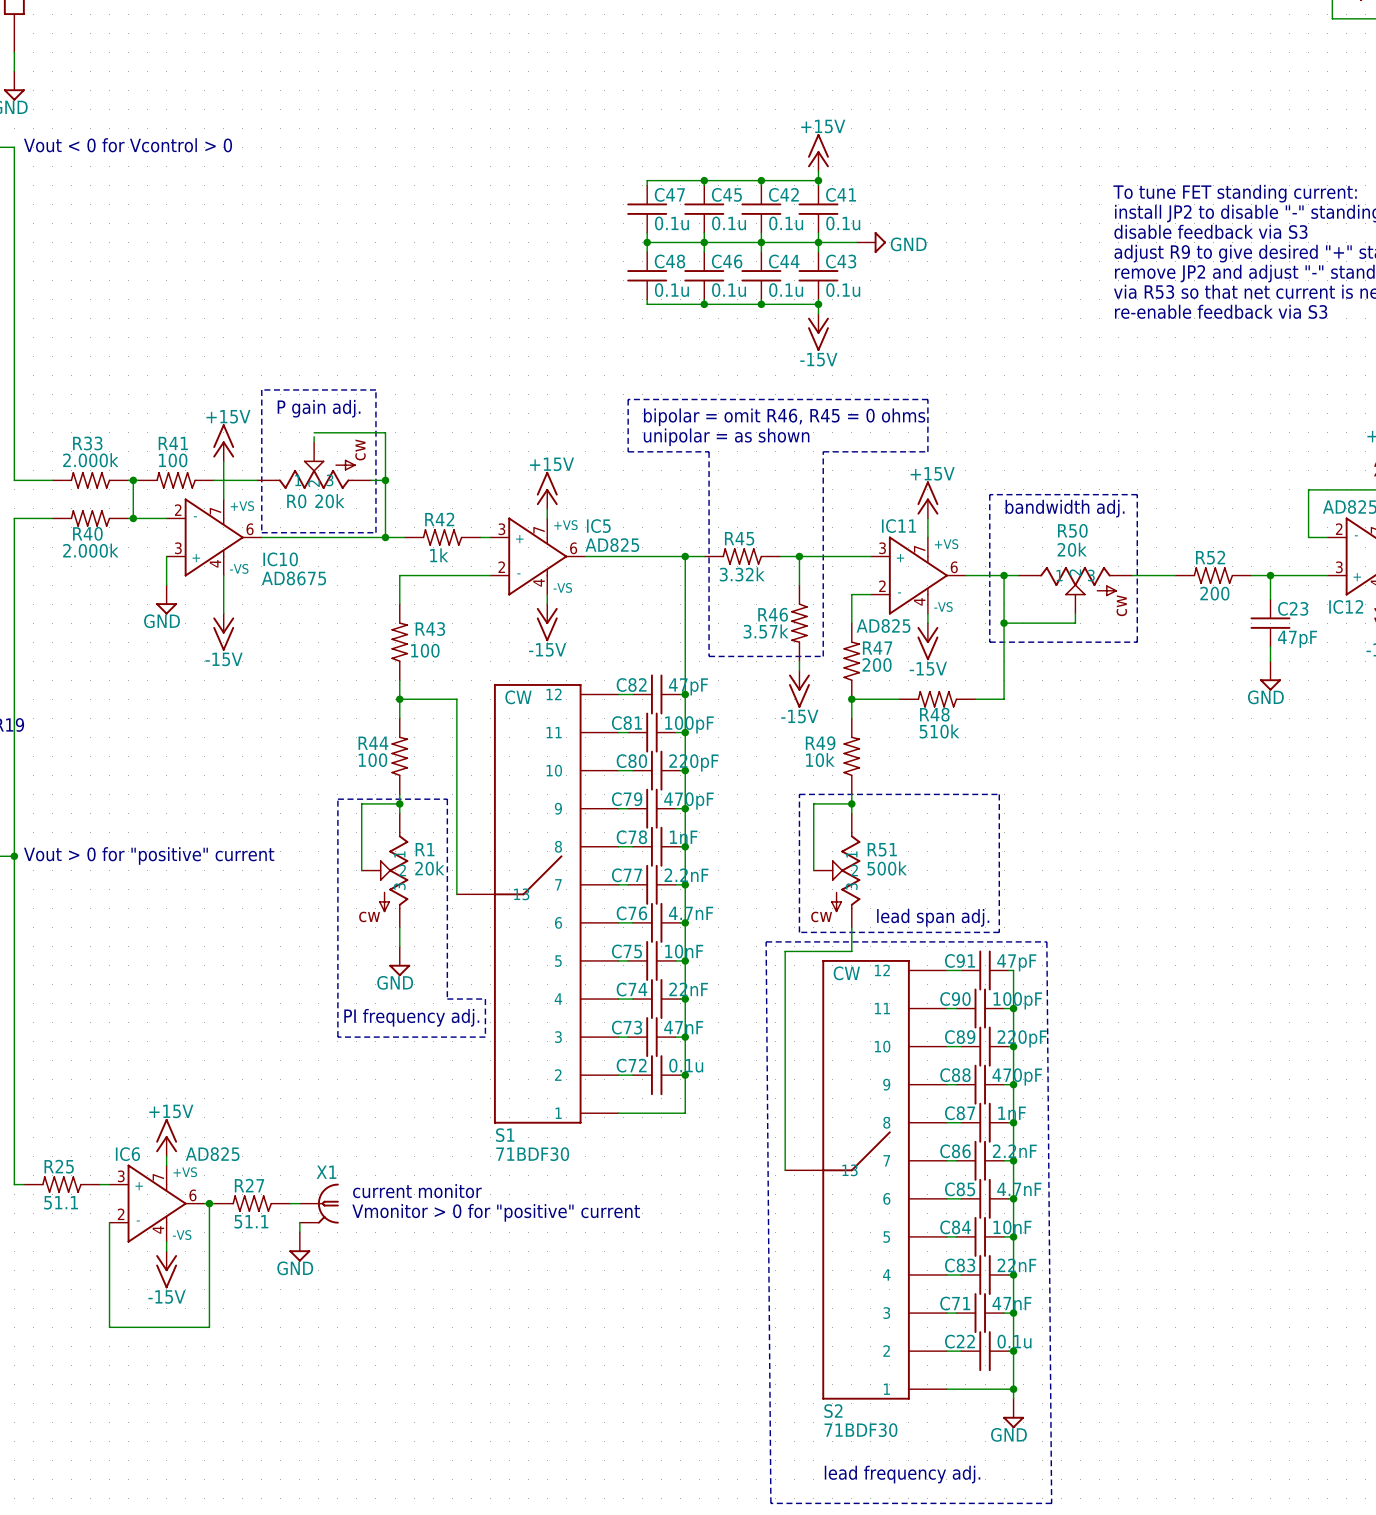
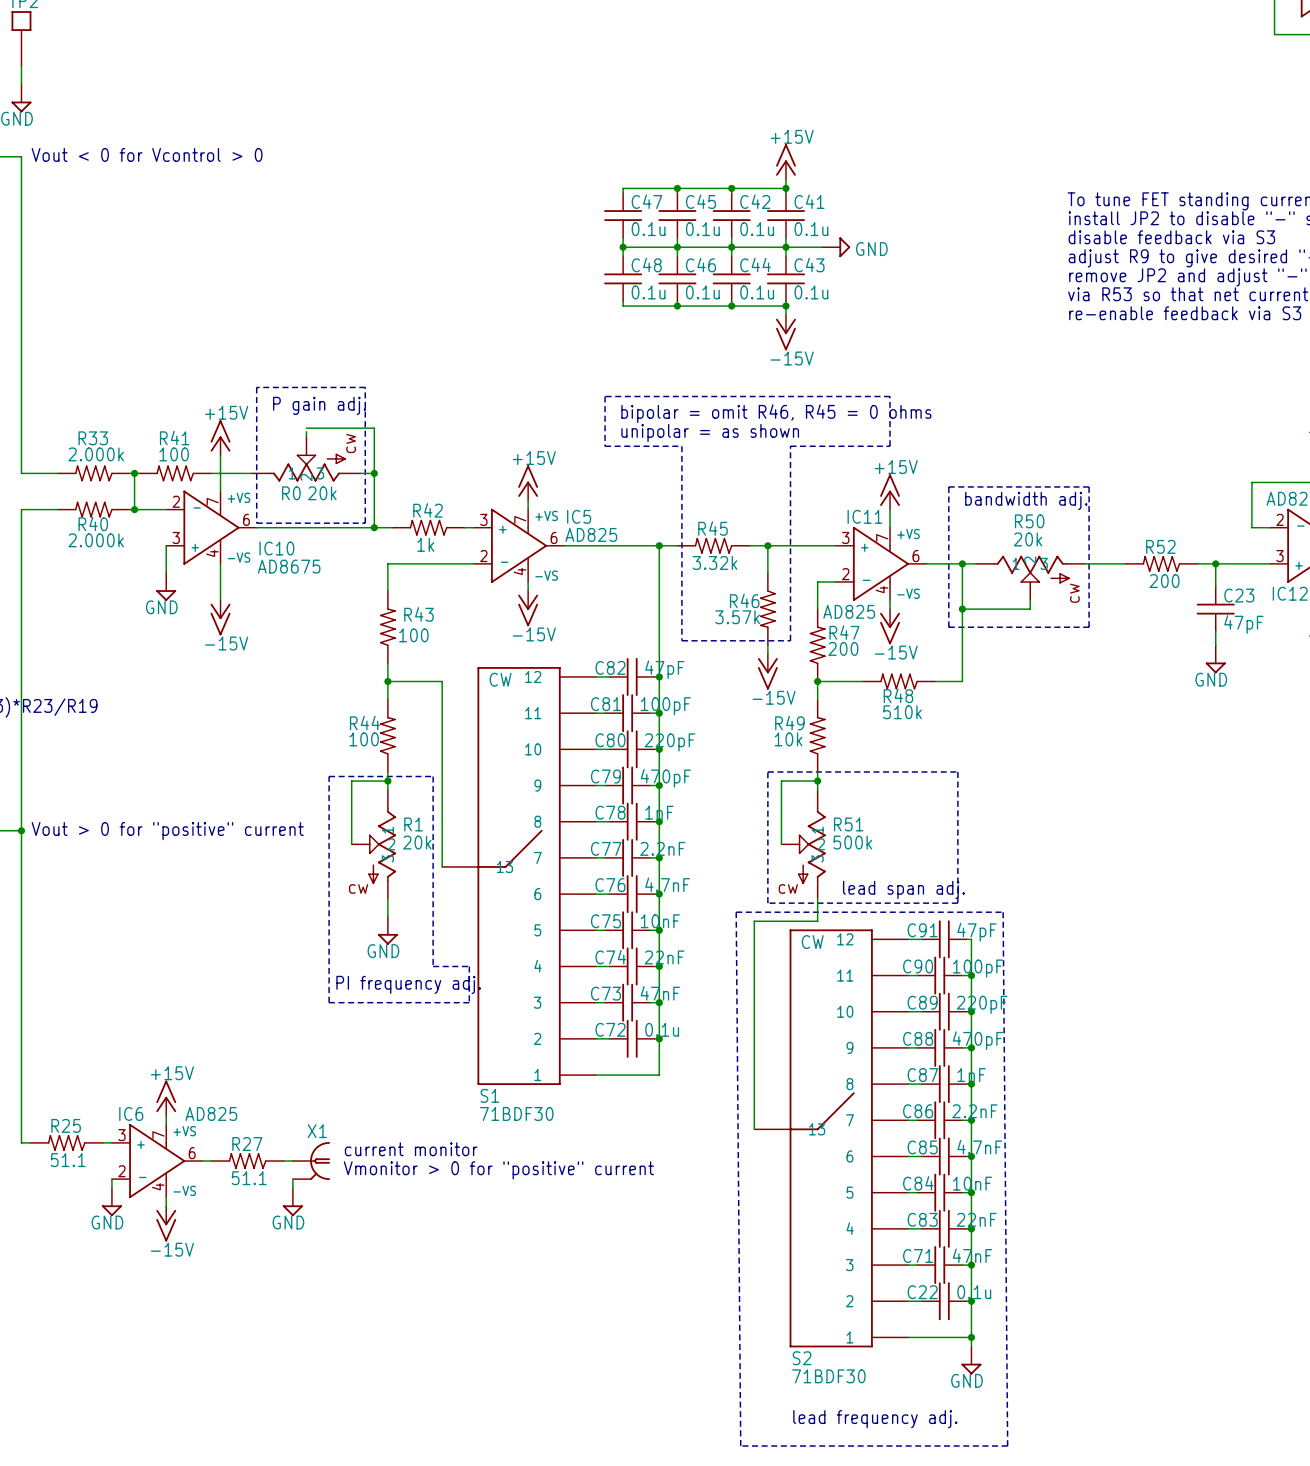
wire: (209, 1203) (209, 1327) (109, 1327) (109, 1232) -> none
junction: (209, 1203) -> none
power symbol: none -> GND (111, 1202)

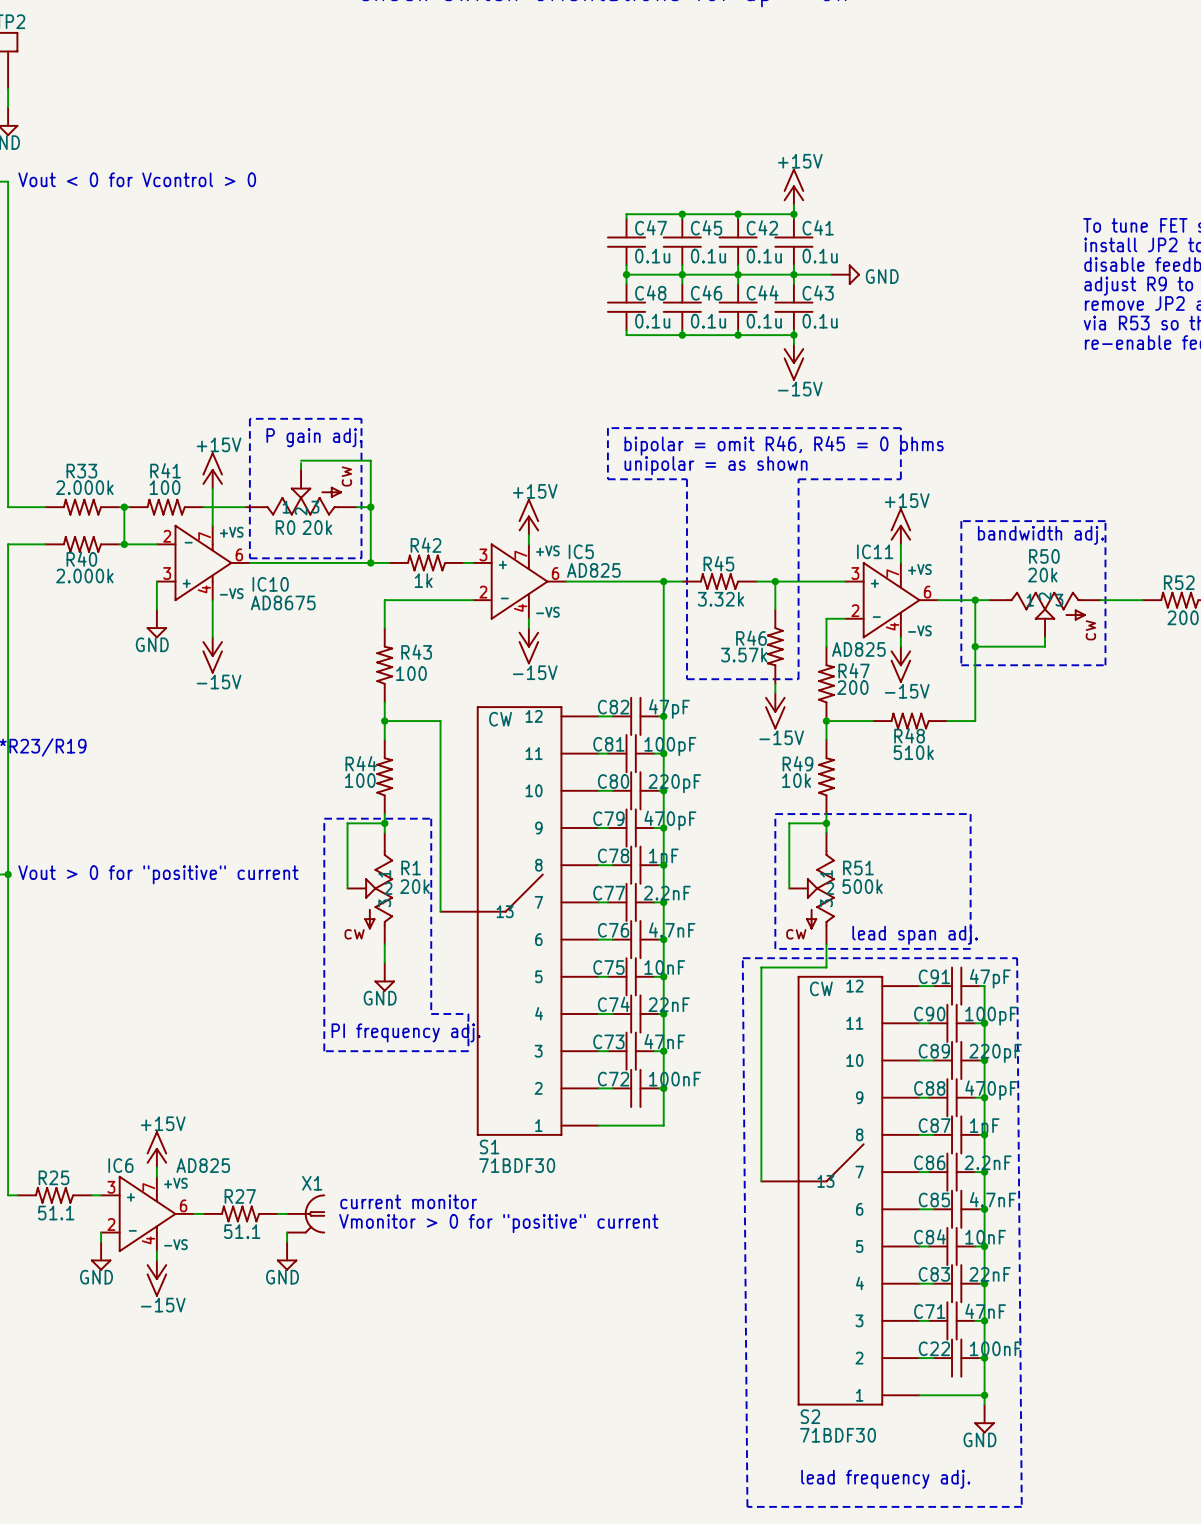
C72 value: 0.1u (662, 1029) -> 100nF (675, 1079)
C22 value: 0.1u (974, 1292) -> 100nF (995, 1348)

